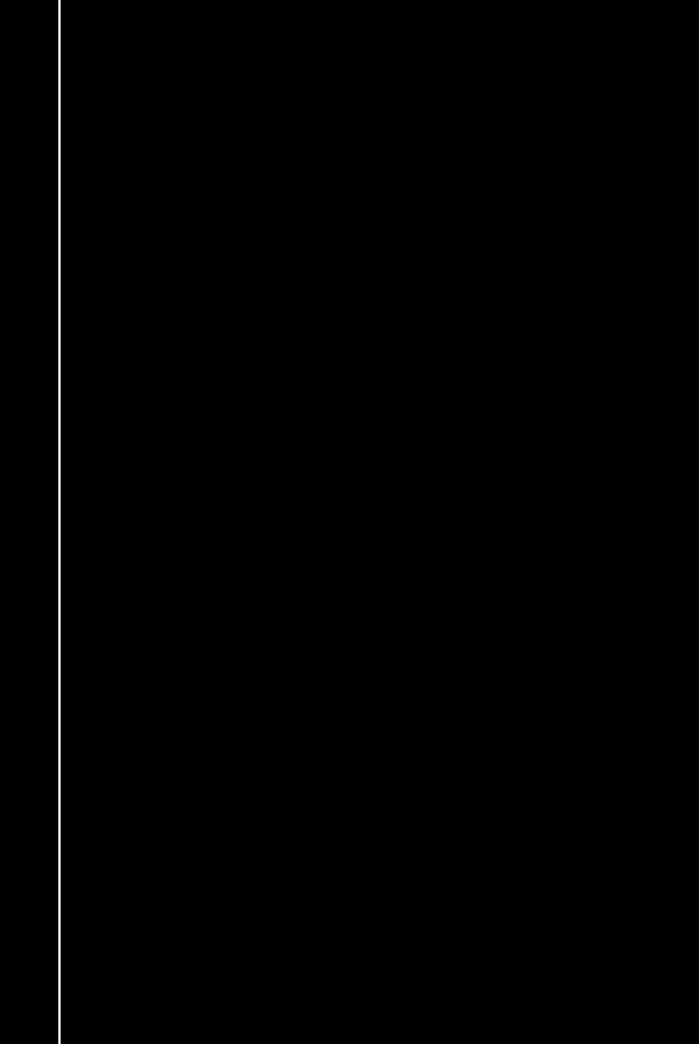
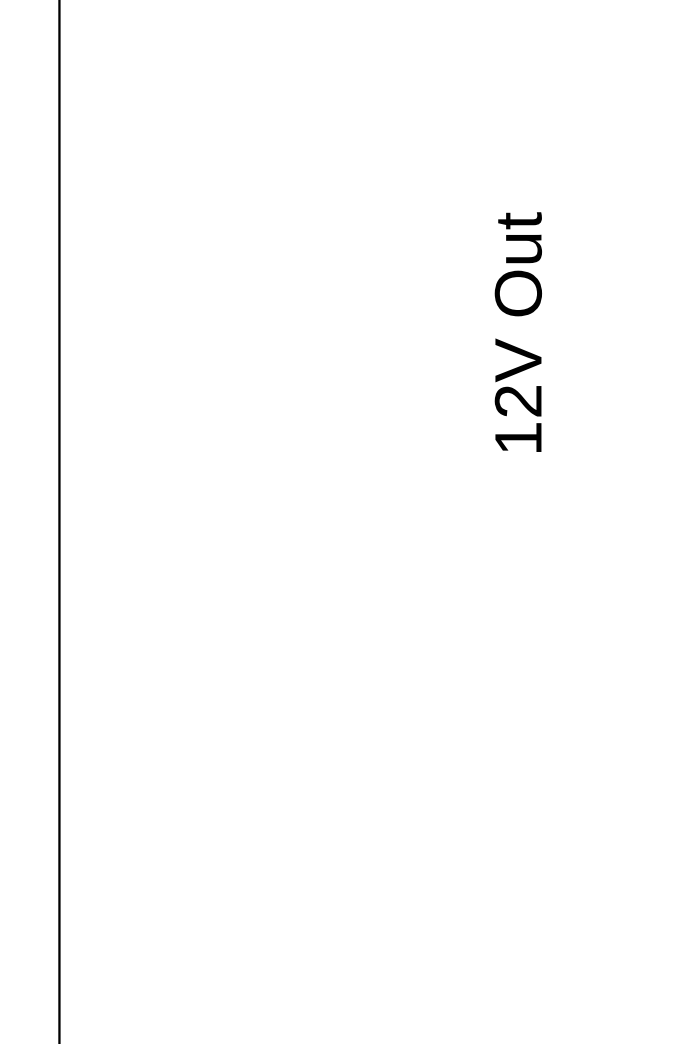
text: none -> 12V Out (518, 332)

